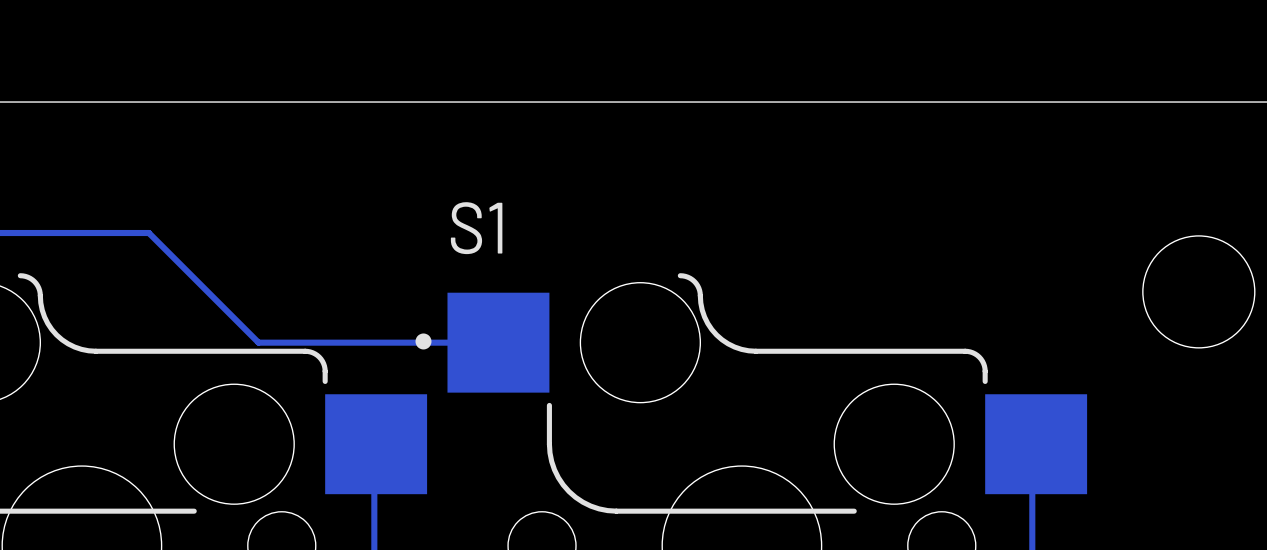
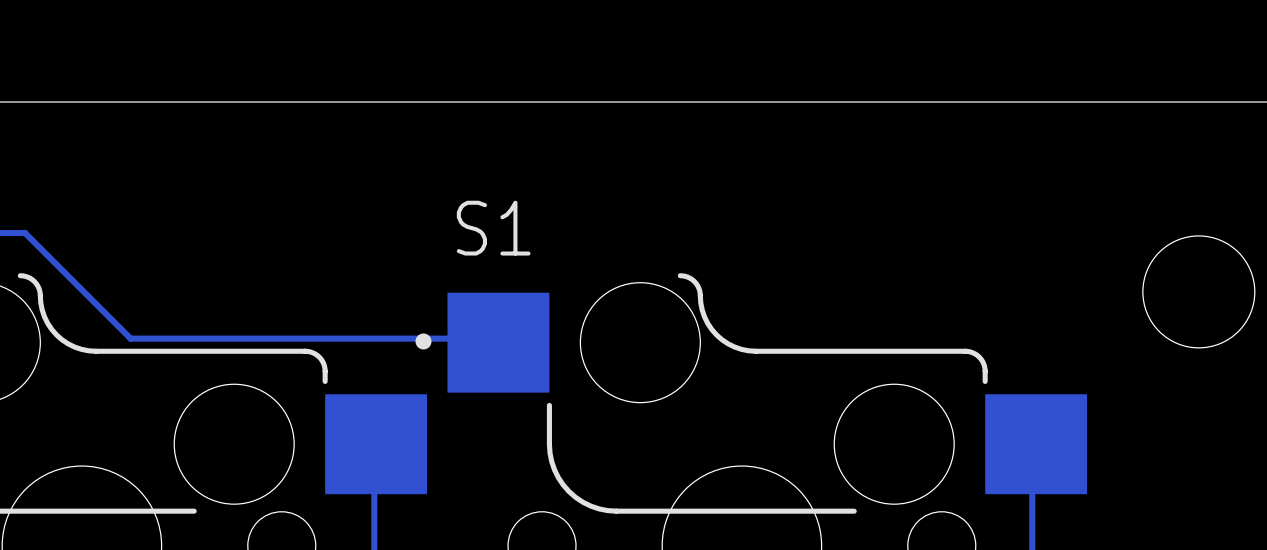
track: (25, 233) (148, 233) (258, 342) (498, 342) -> (25, 233) (130, 338) (496, 338) (498, 342)

